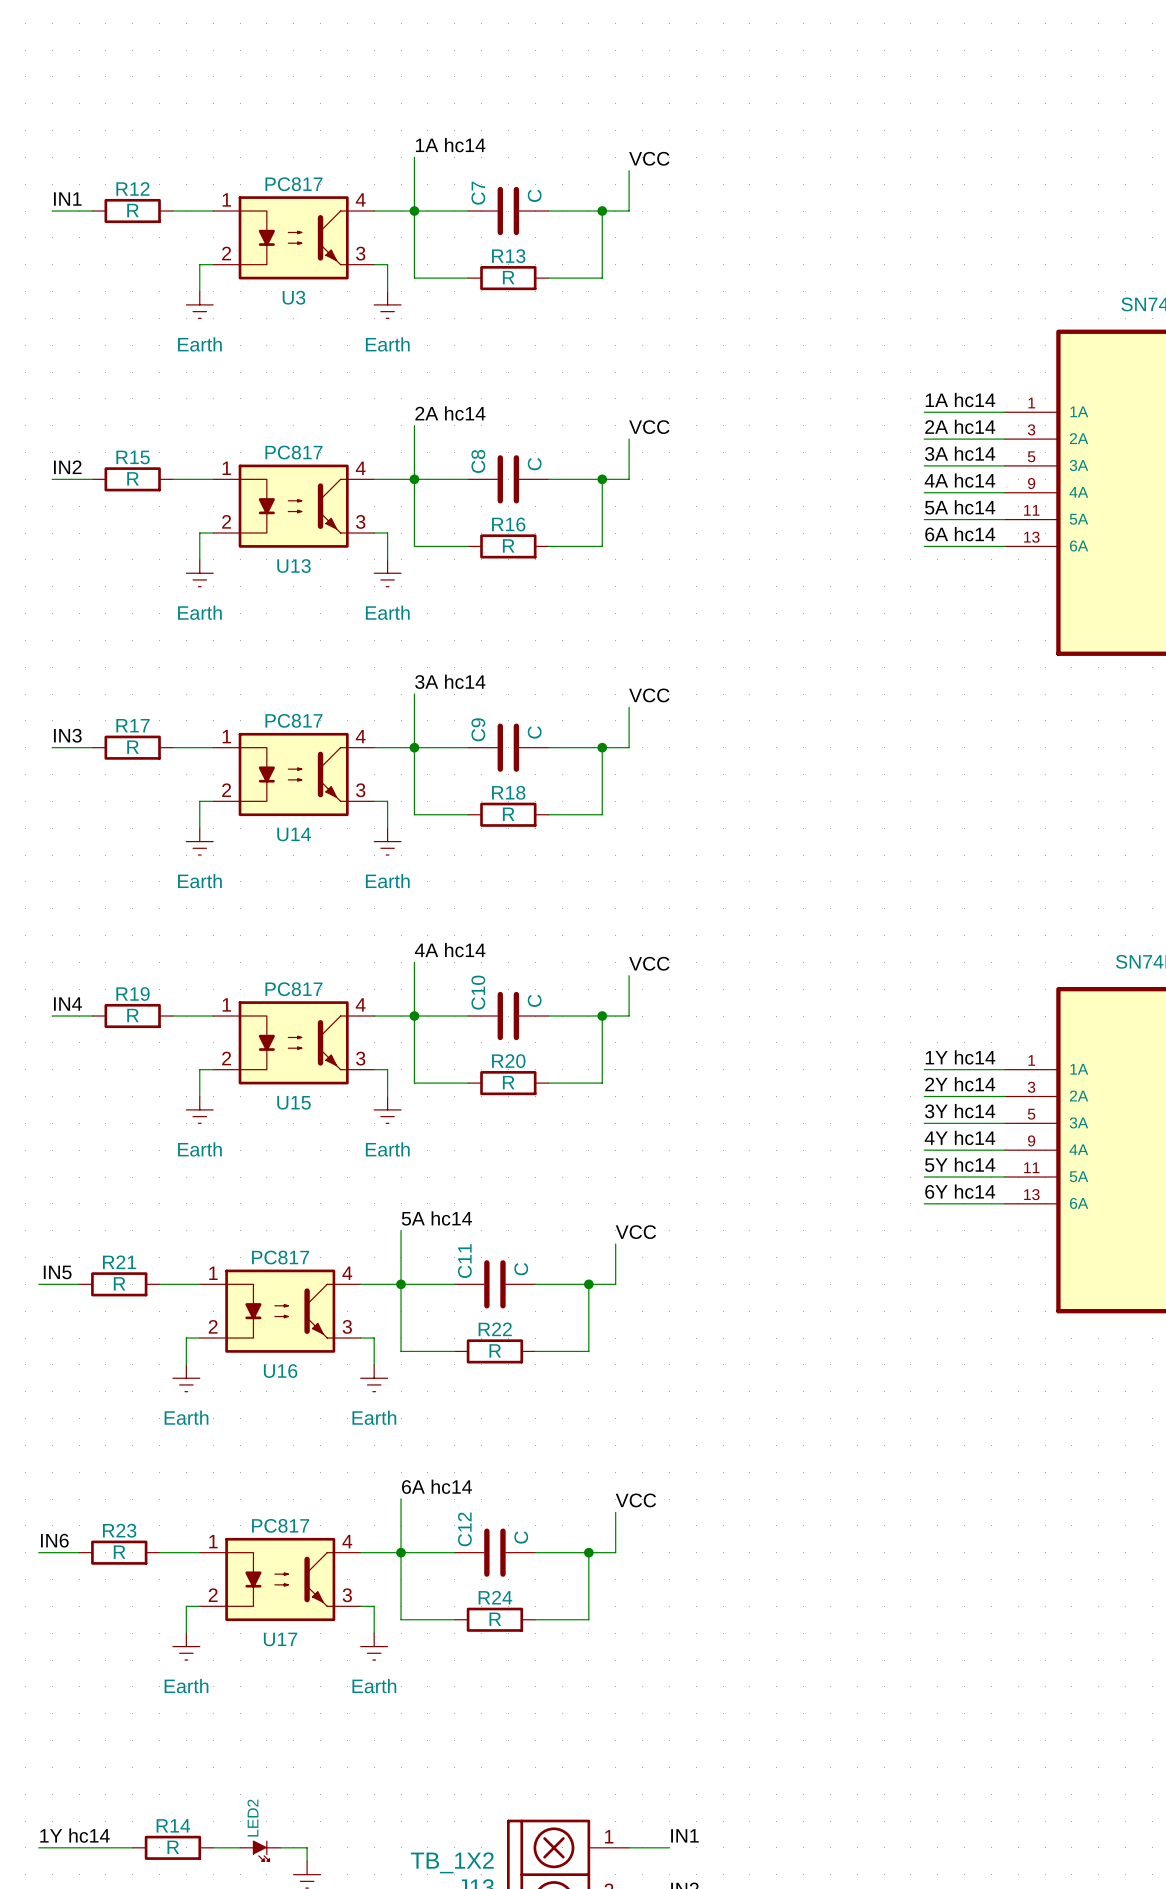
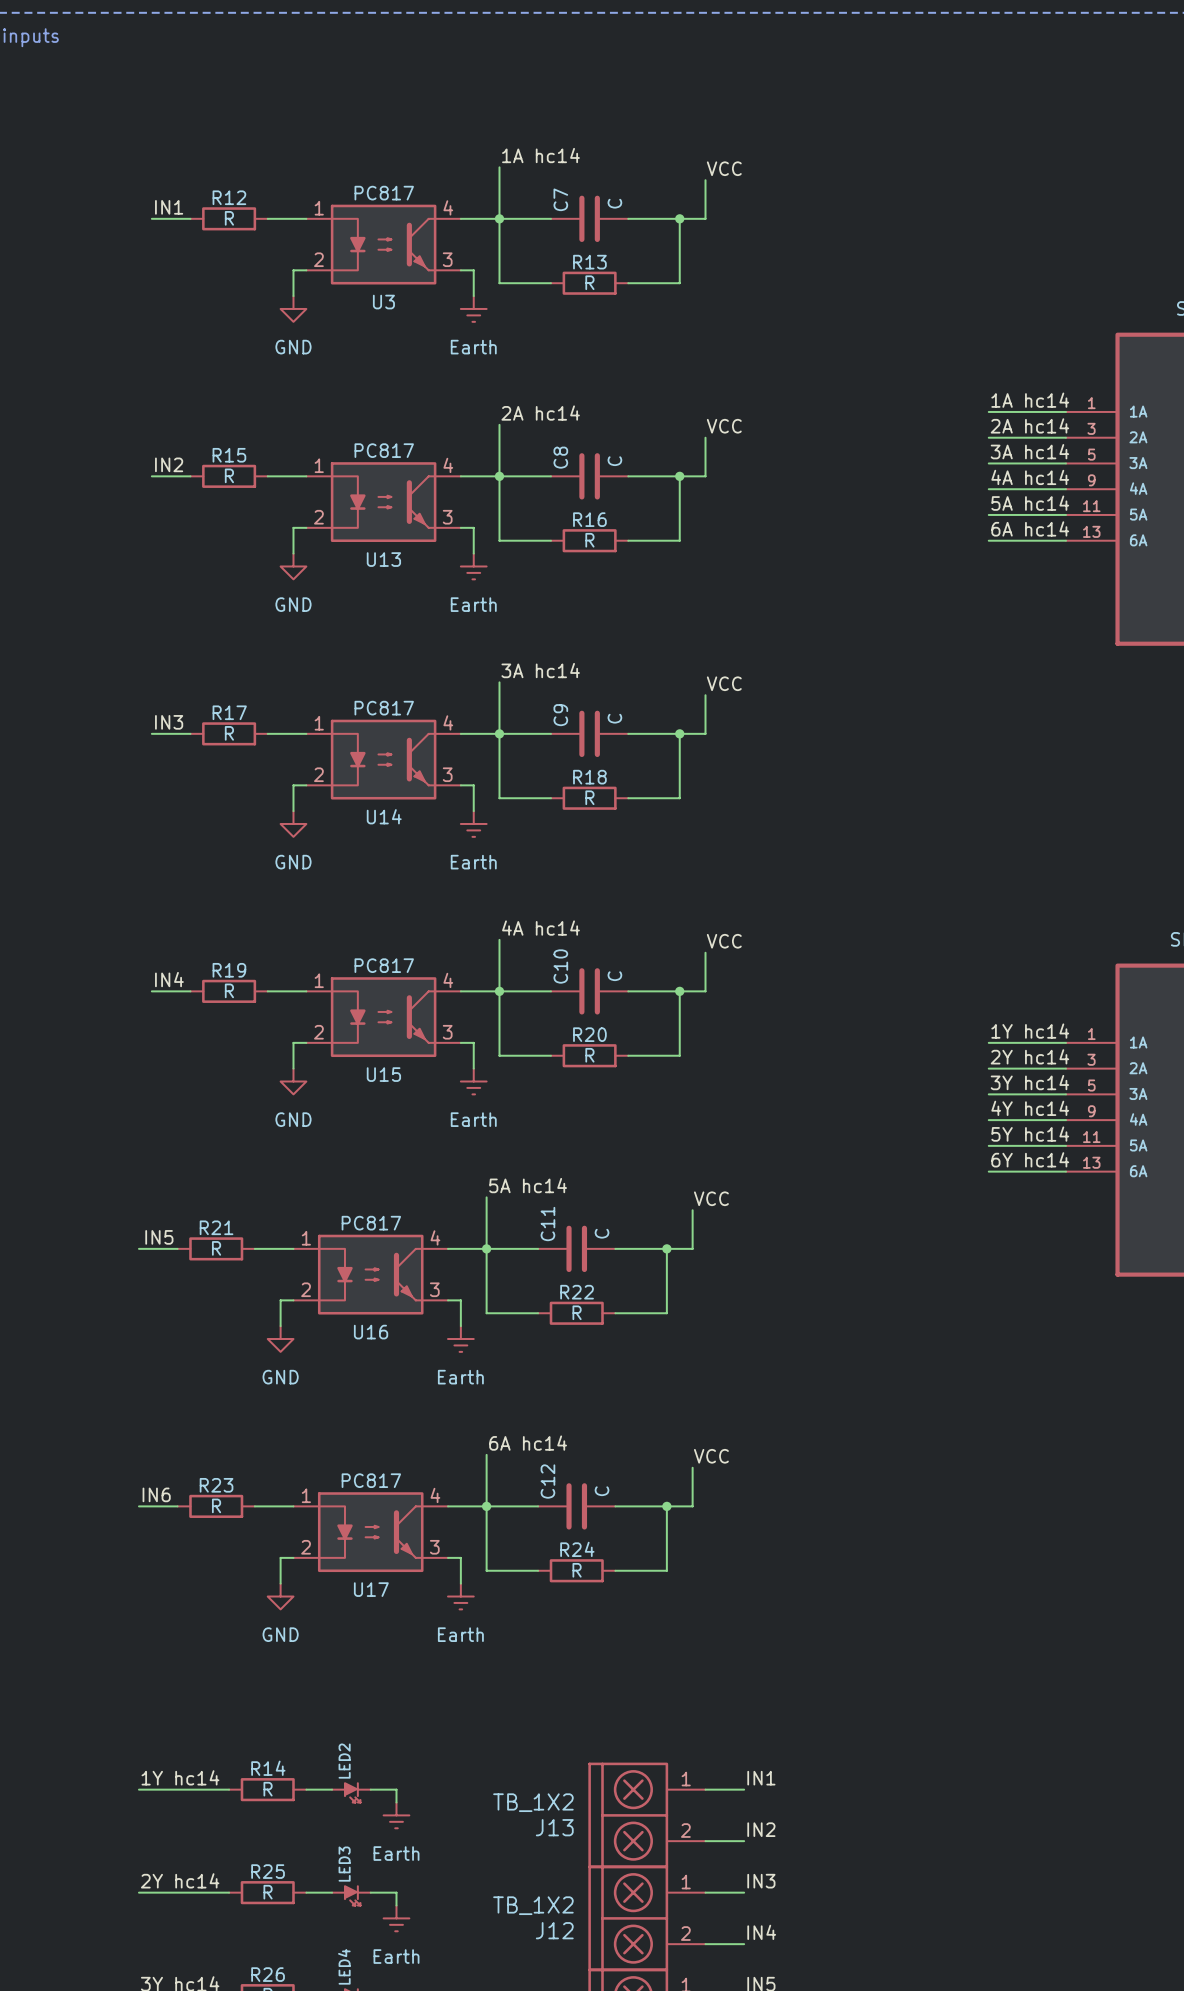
power symbol: Earth (199, 304) -> GND (293, 308)
power symbol: Earth (199, 573) -> GND (293, 566)
power symbol: Earth (199, 841) -> GND (293, 823)
power symbol: Earth (199, 1109) -> GND (293, 1081)
power symbol: Earth (186, 1378) -> GND (280, 1339)
power symbol: Earth (186, 1646) -> GND (280, 1596)

